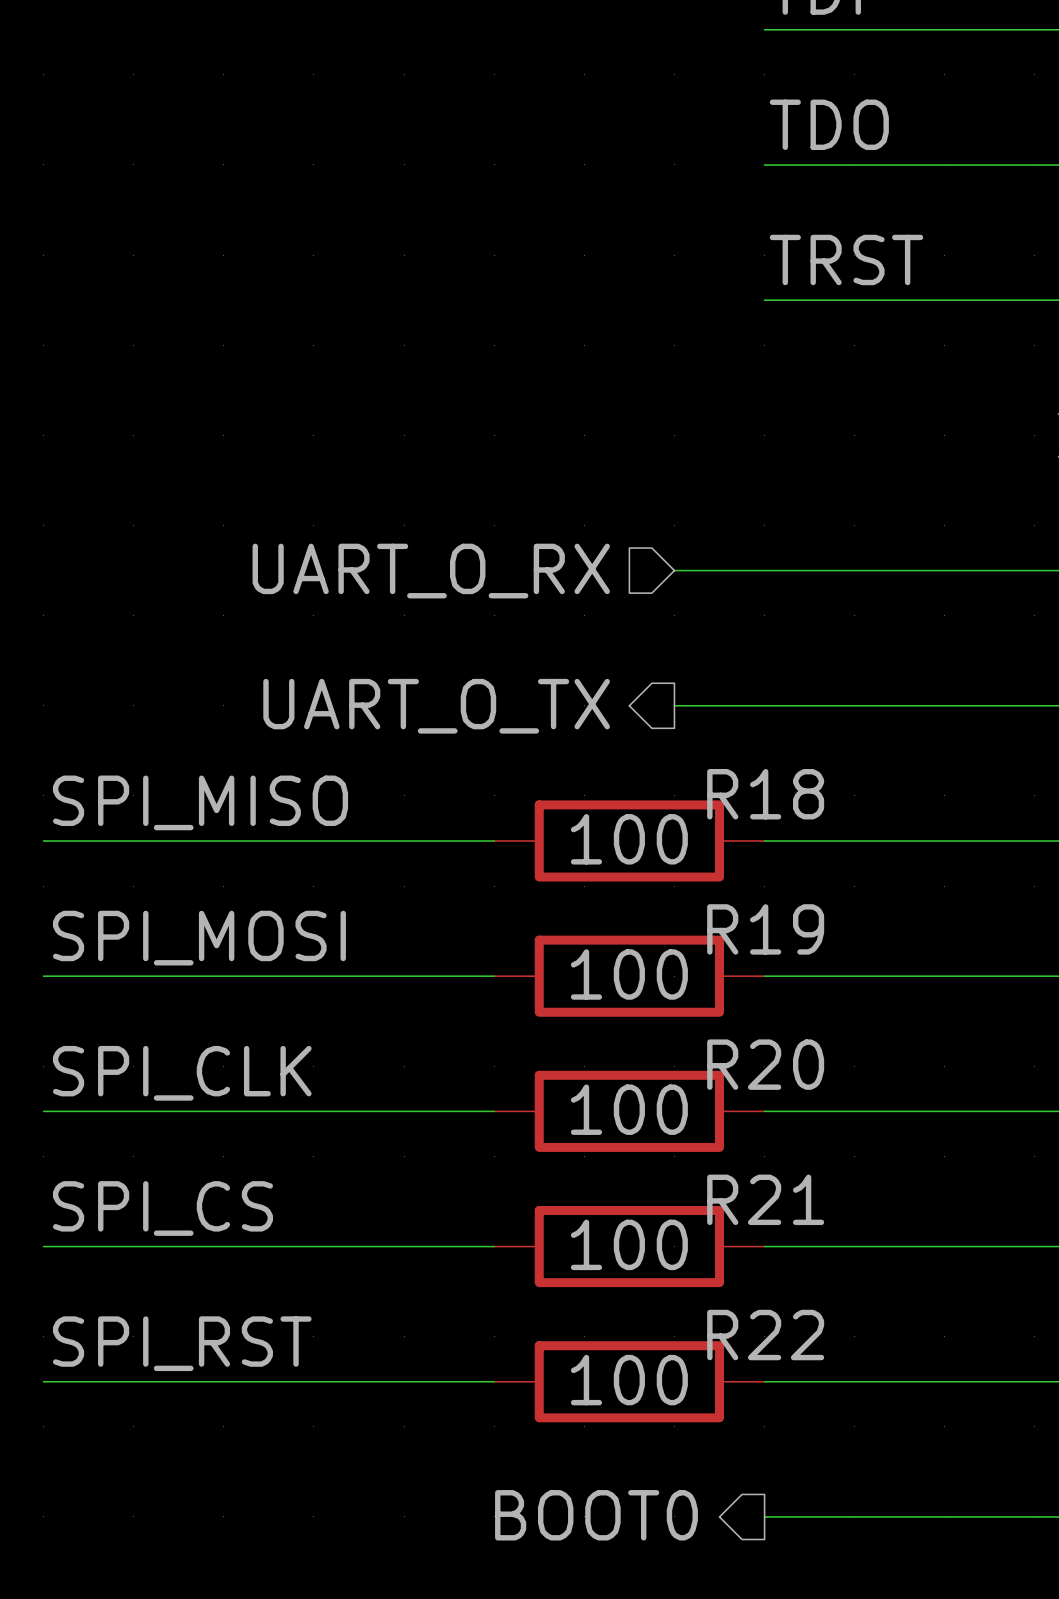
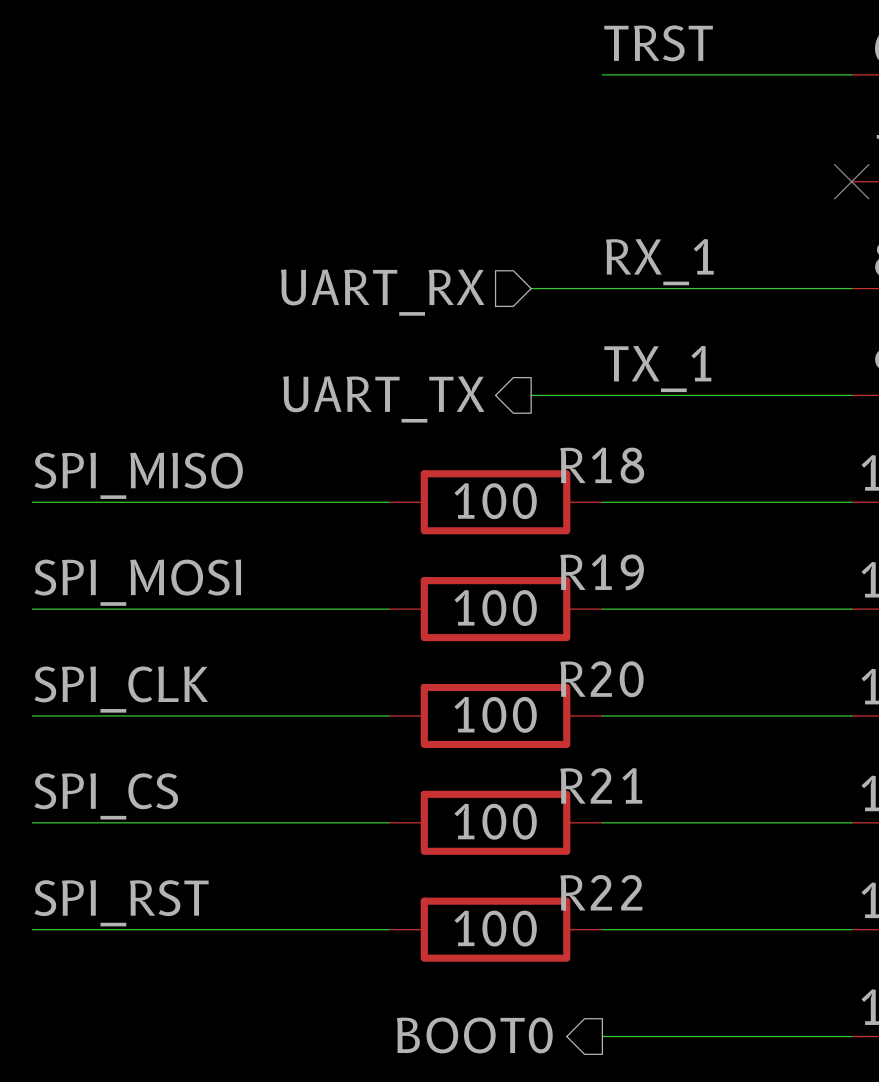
label: none -> RX_1 (659, 262)
hierarchical label: UART_O_RX (431, 571) -> UART_RX (382, 292)
label: none -> TX_1 (657, 368)
hierarchical label: UART_O_TX (436, 706) -> UART_TX (383, 399)

